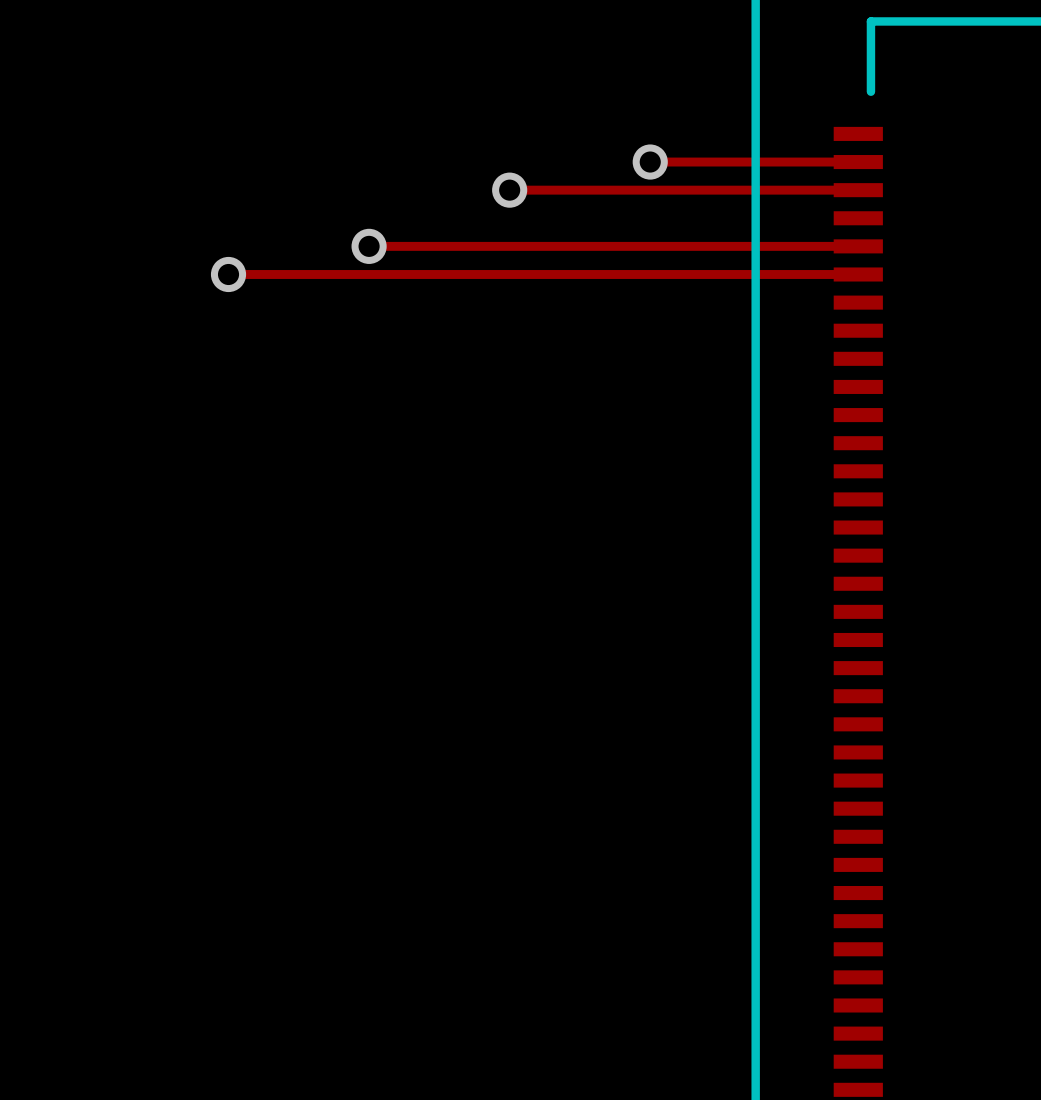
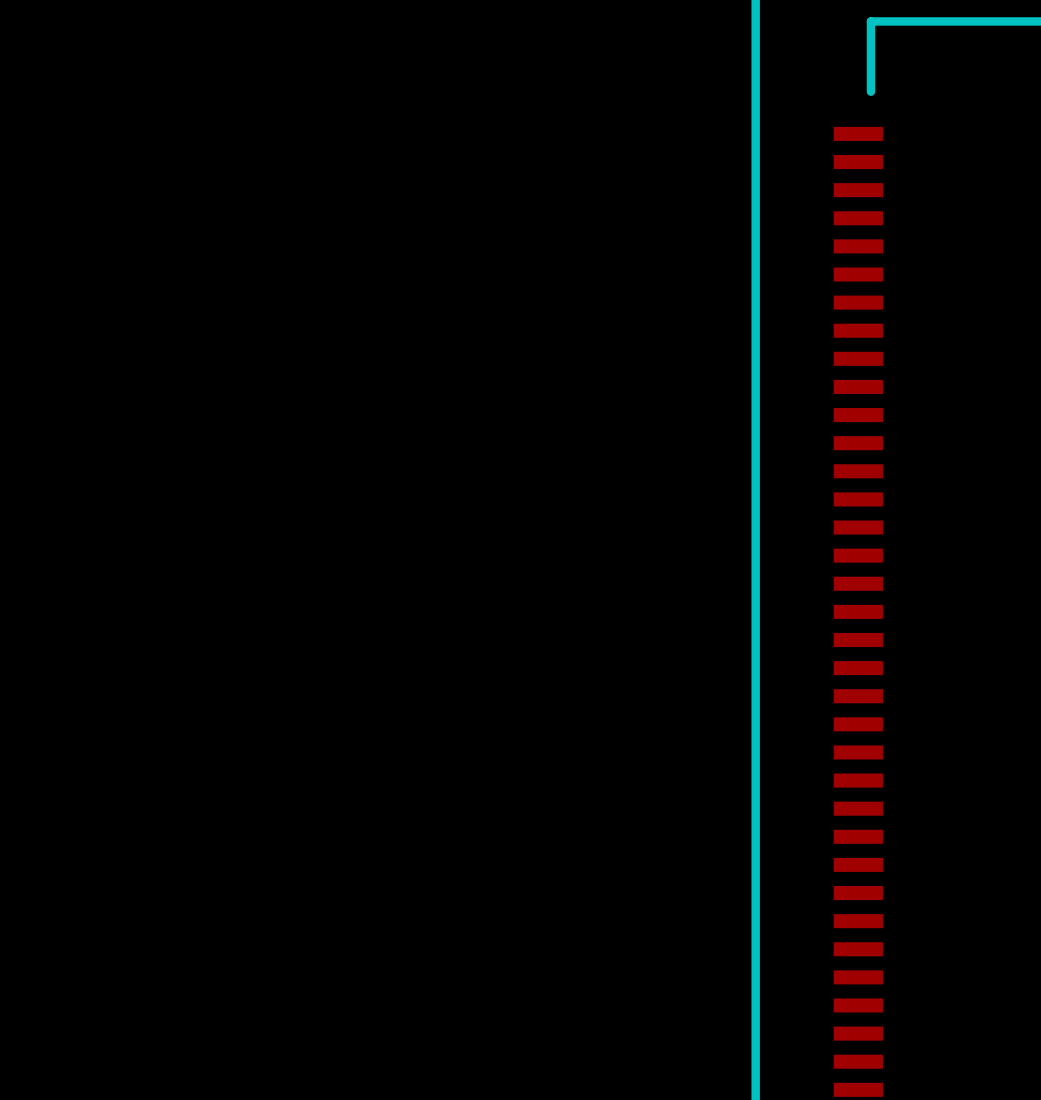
track: (650, 162) (858, 162) -> none
via: (650, 162) -> none
track: (509, 190) (858, 190) -> none
via: (509, 190) -> none
track: (369, 246) (858, 246) -> none
via: (369, 246) -> none
track: (228, 274) (858, 274) -> none
via: (228, 274) -> none

